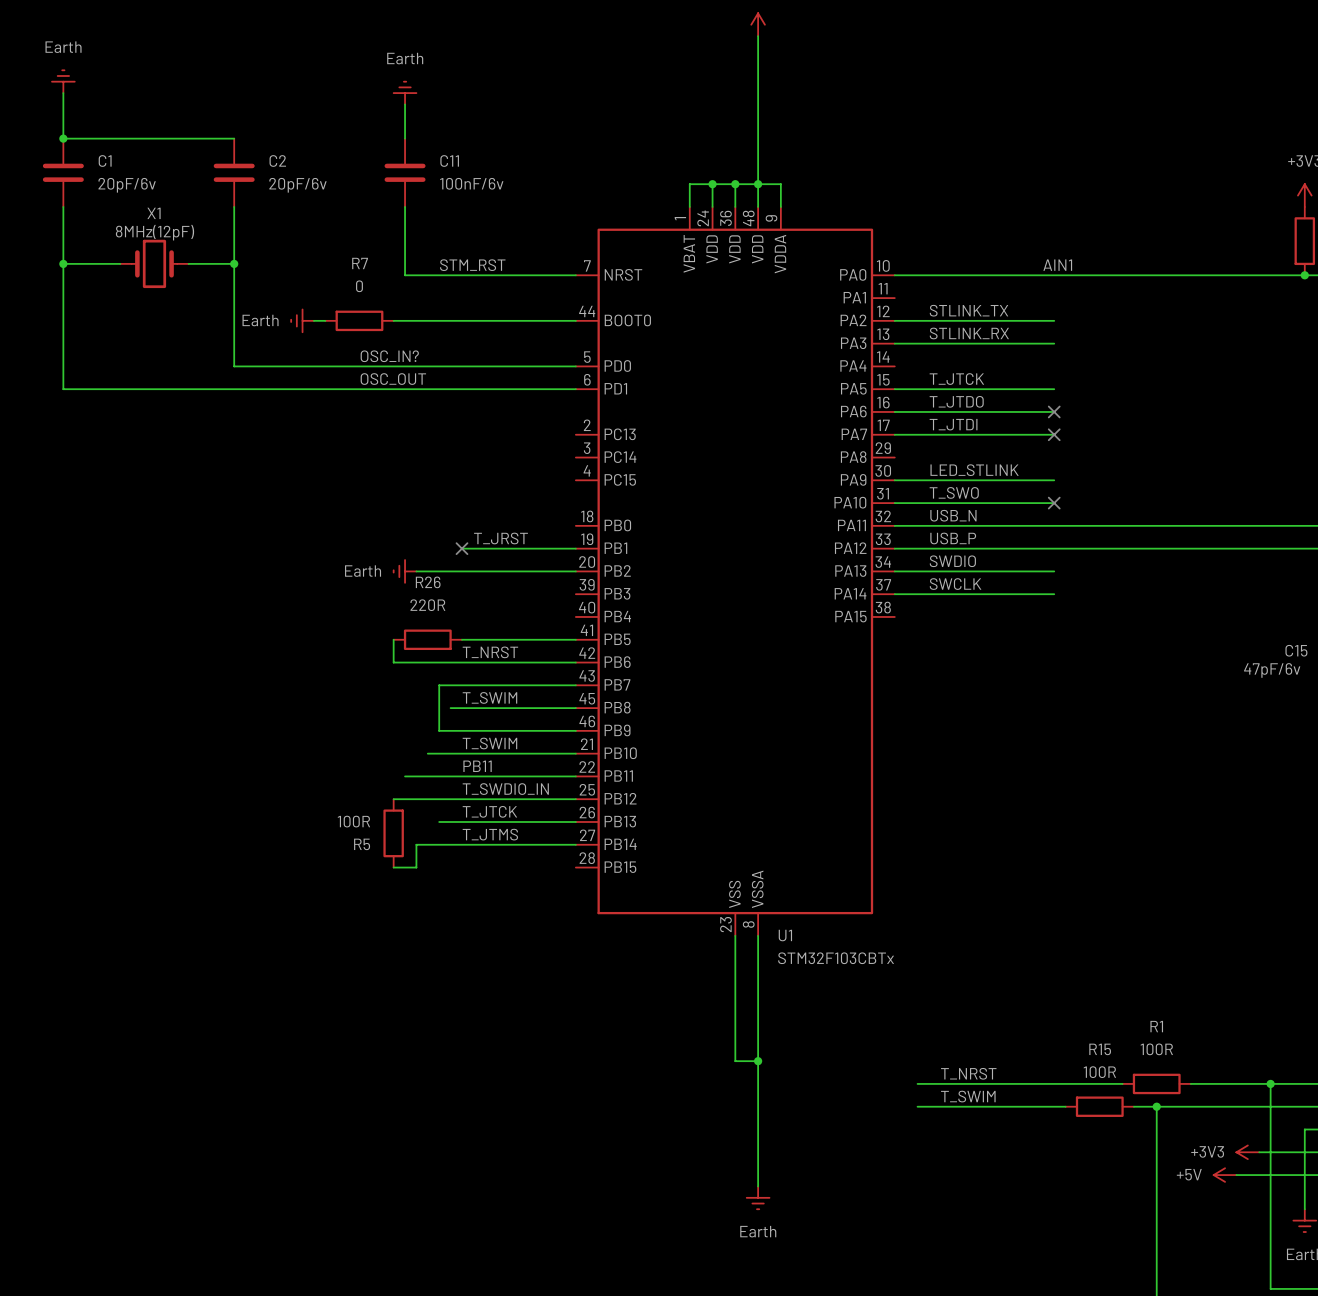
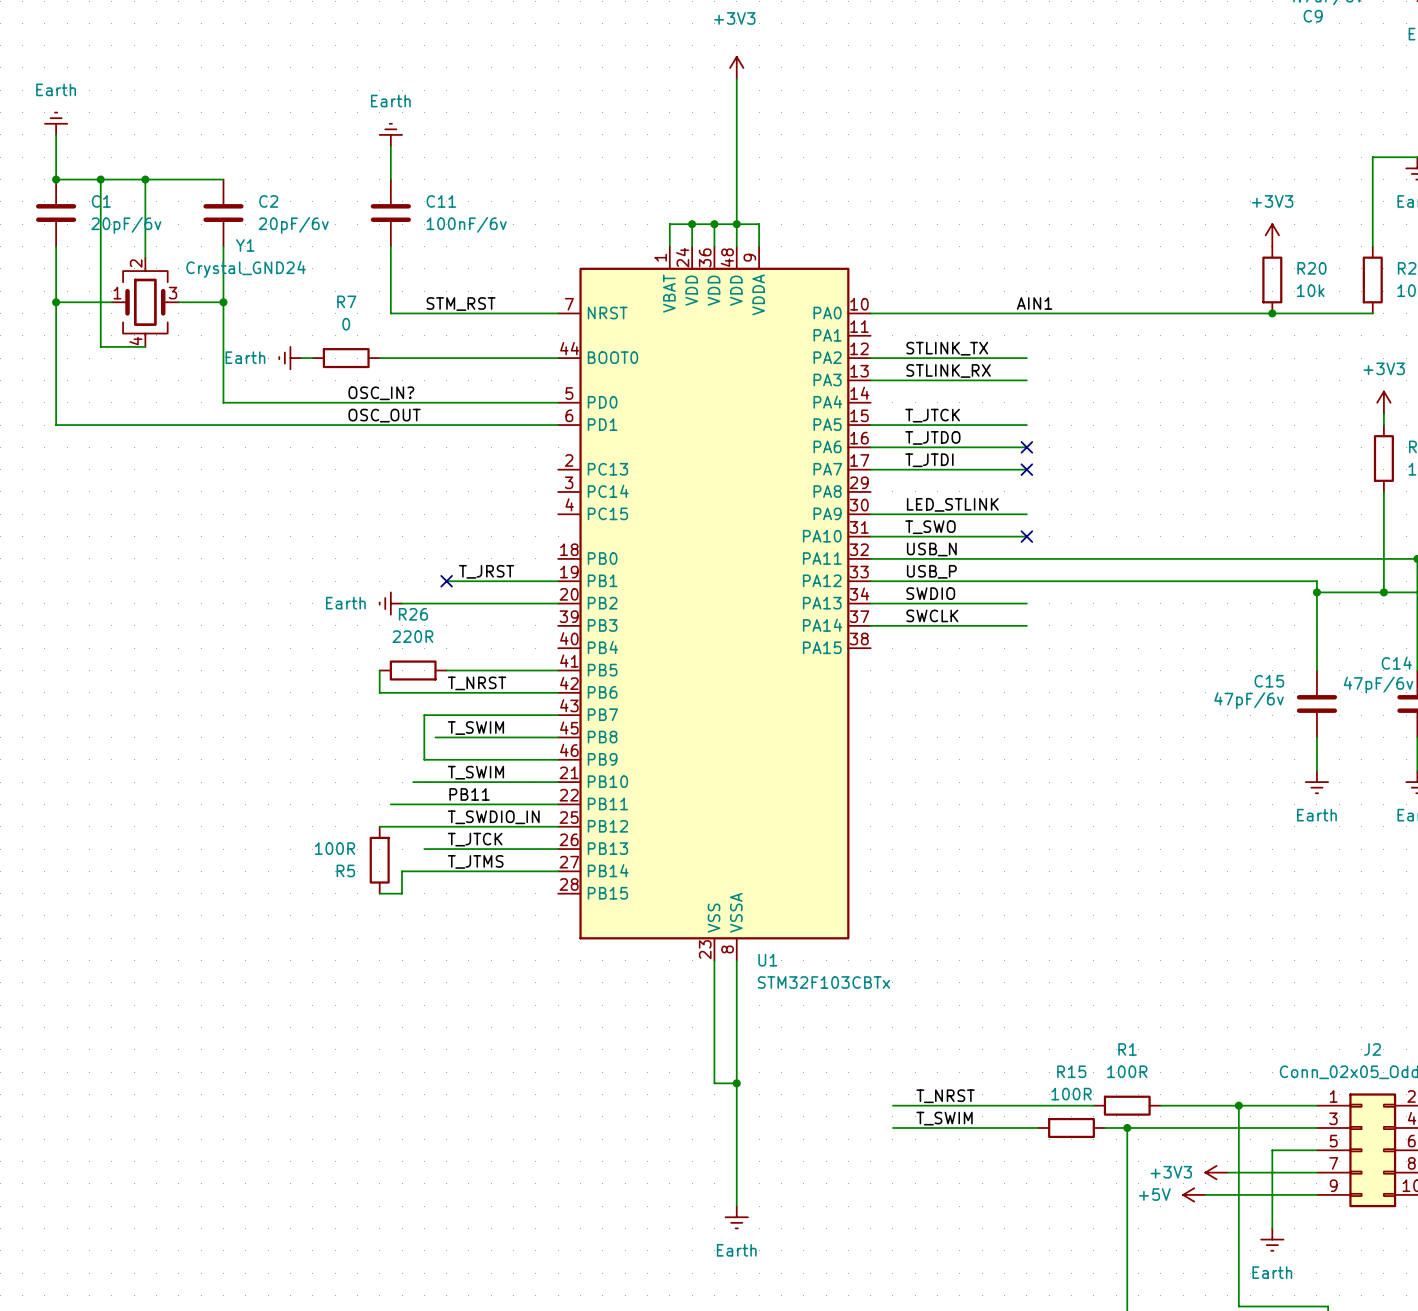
wire: none -> (100, 179) (100, 346) (145, 346)
junction: none -> (100, 179)
wire: none -> (145, 179) (145, 257)
junction: none -> (145, 179)
X1: 8MHz(12pF) (154, 263) -> none
Y1: none -> Crystal_GND24 (145, 302)

